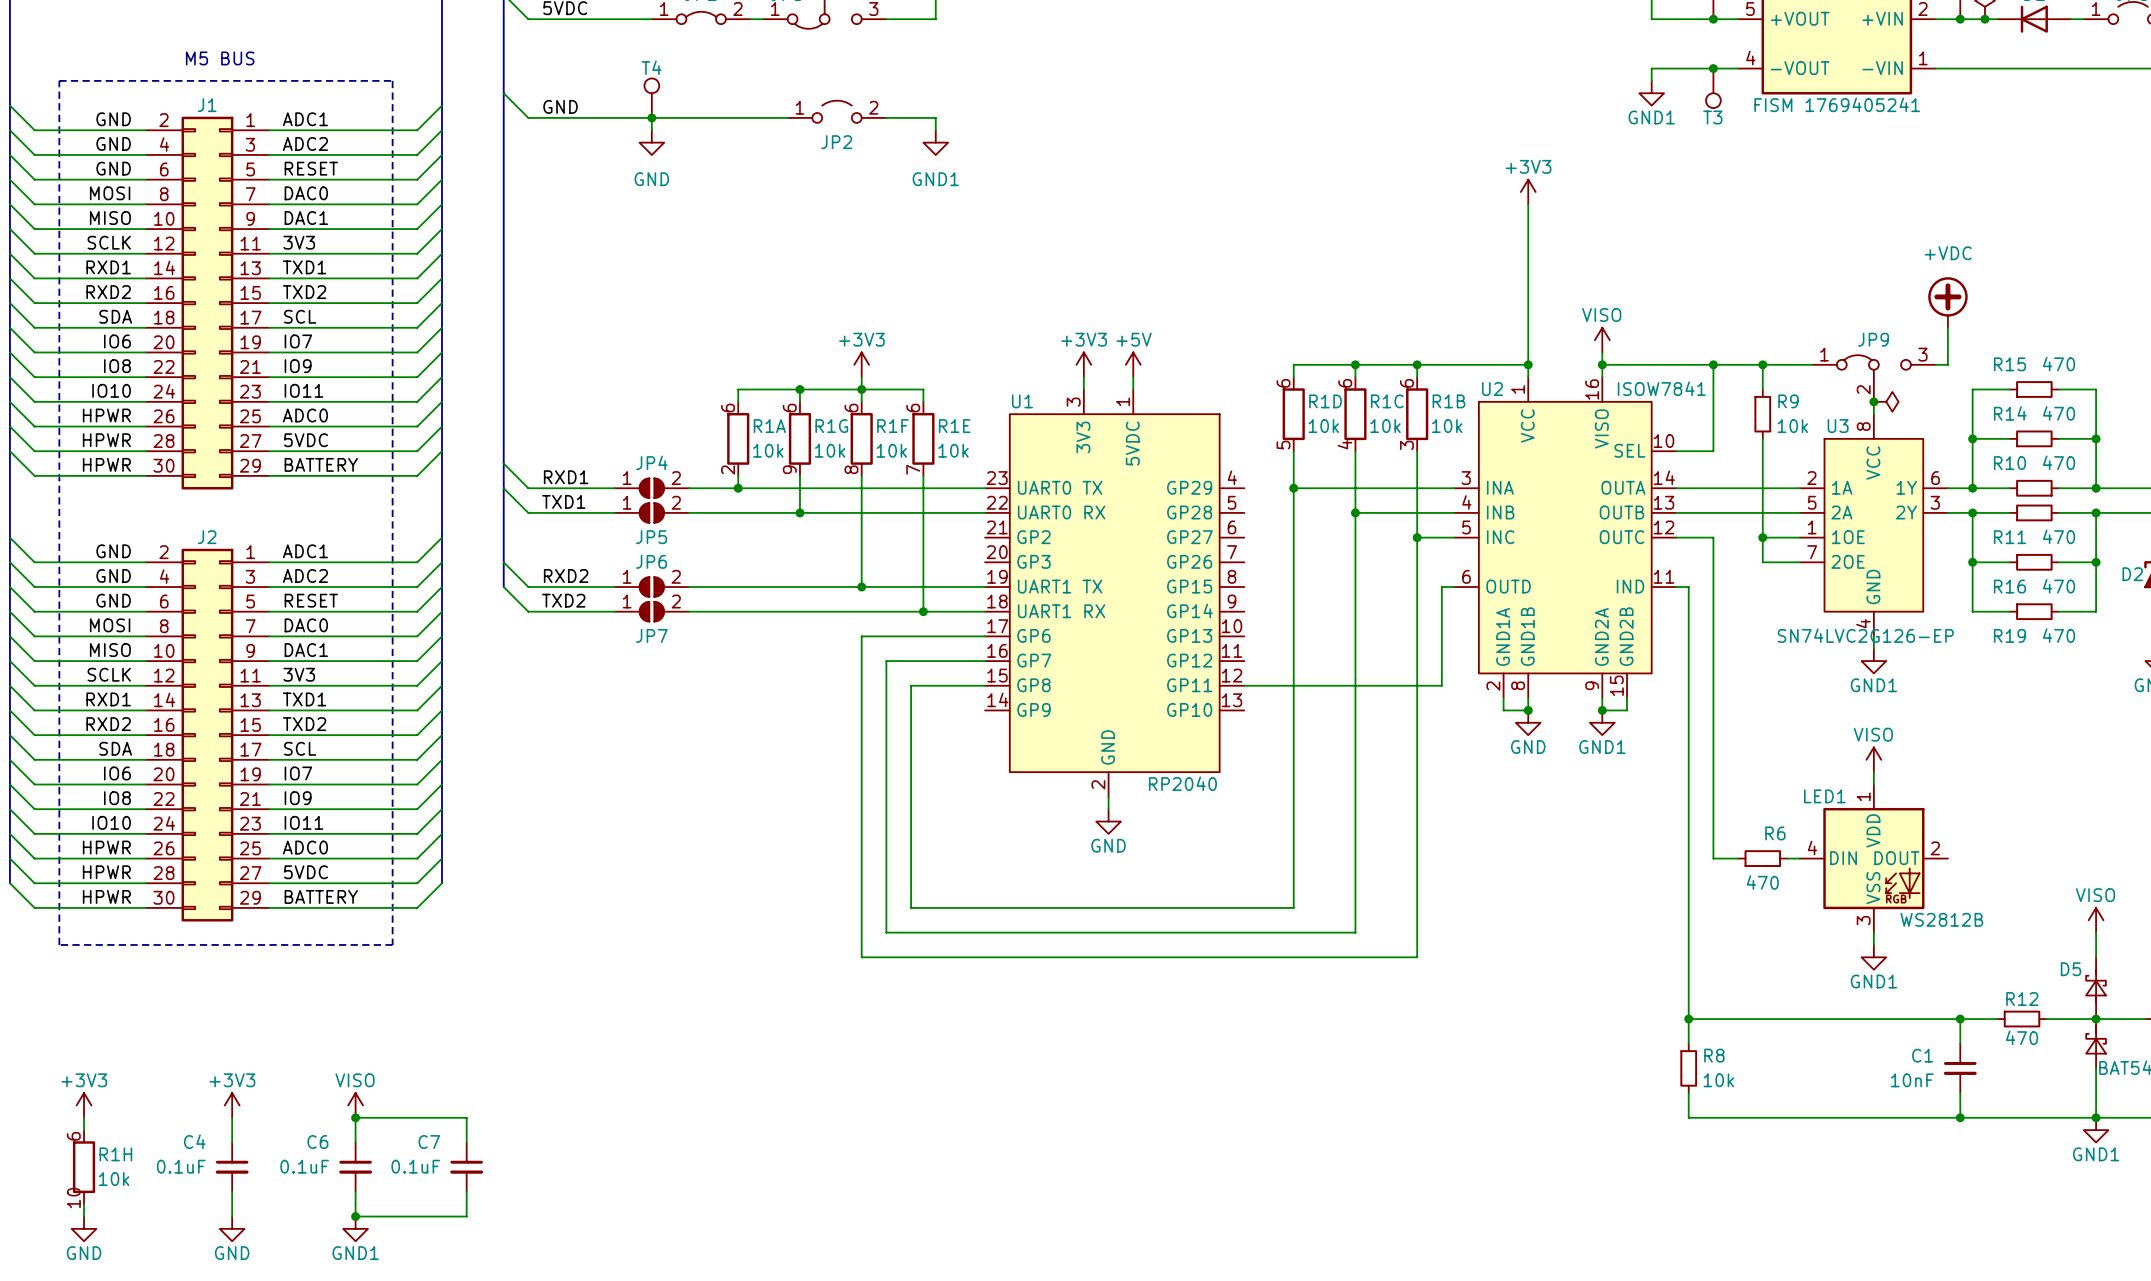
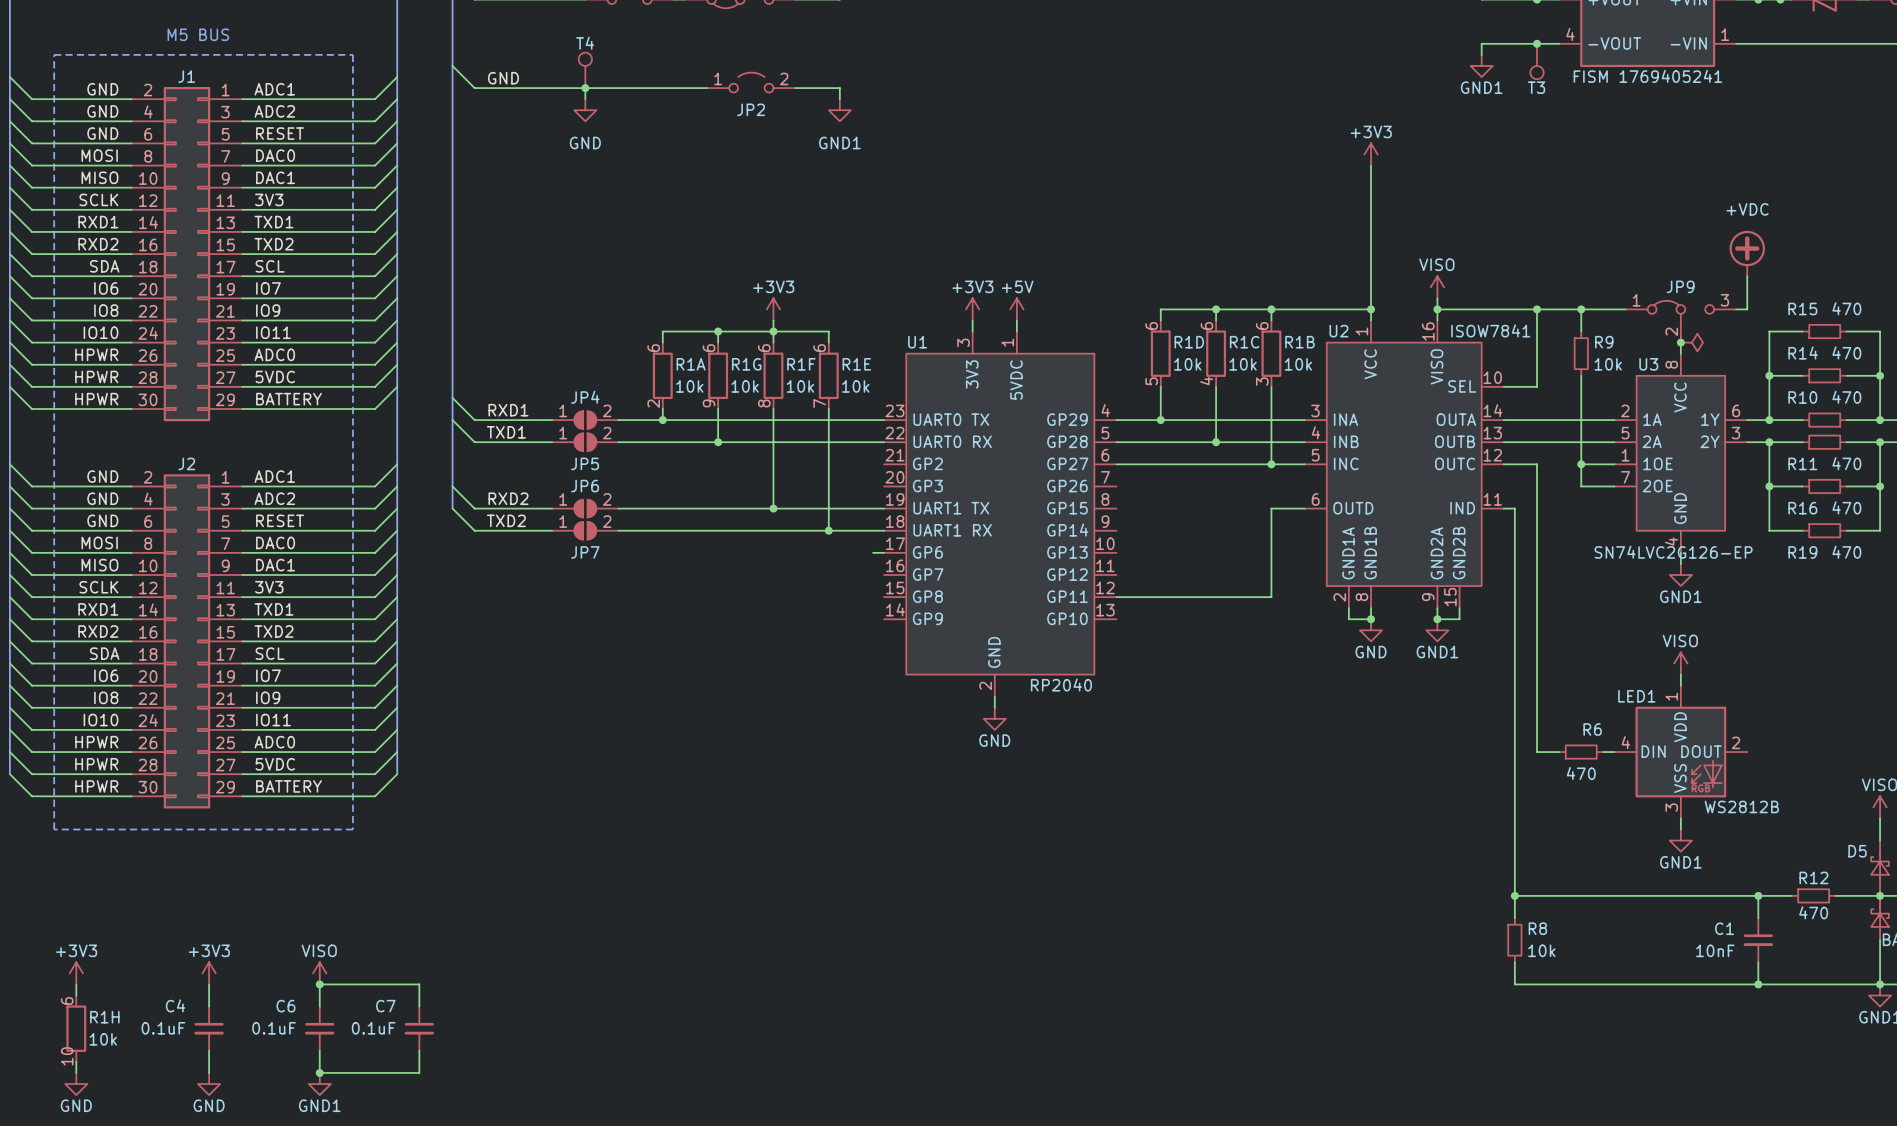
wire: (1293, 488) (1293, 907) (911, 907) (911, 685) (985, 685) -> (1160, 420) (1116, 420)
wire: (1355, 512) (1355, 932) (886, 932) (886, 661) (985, 661) -> (1216, 442) (1116, 442)
wire: none -> (1116, 464) (1271, 464)
wire: (1417, 537) (1417, 587) -> (1293, 508) (1271, 508)
wire: (1441, 587) (1441, 685) (1417, 685) (1417, 957) (861, 957) (861, 636) (972, 636) -> none

